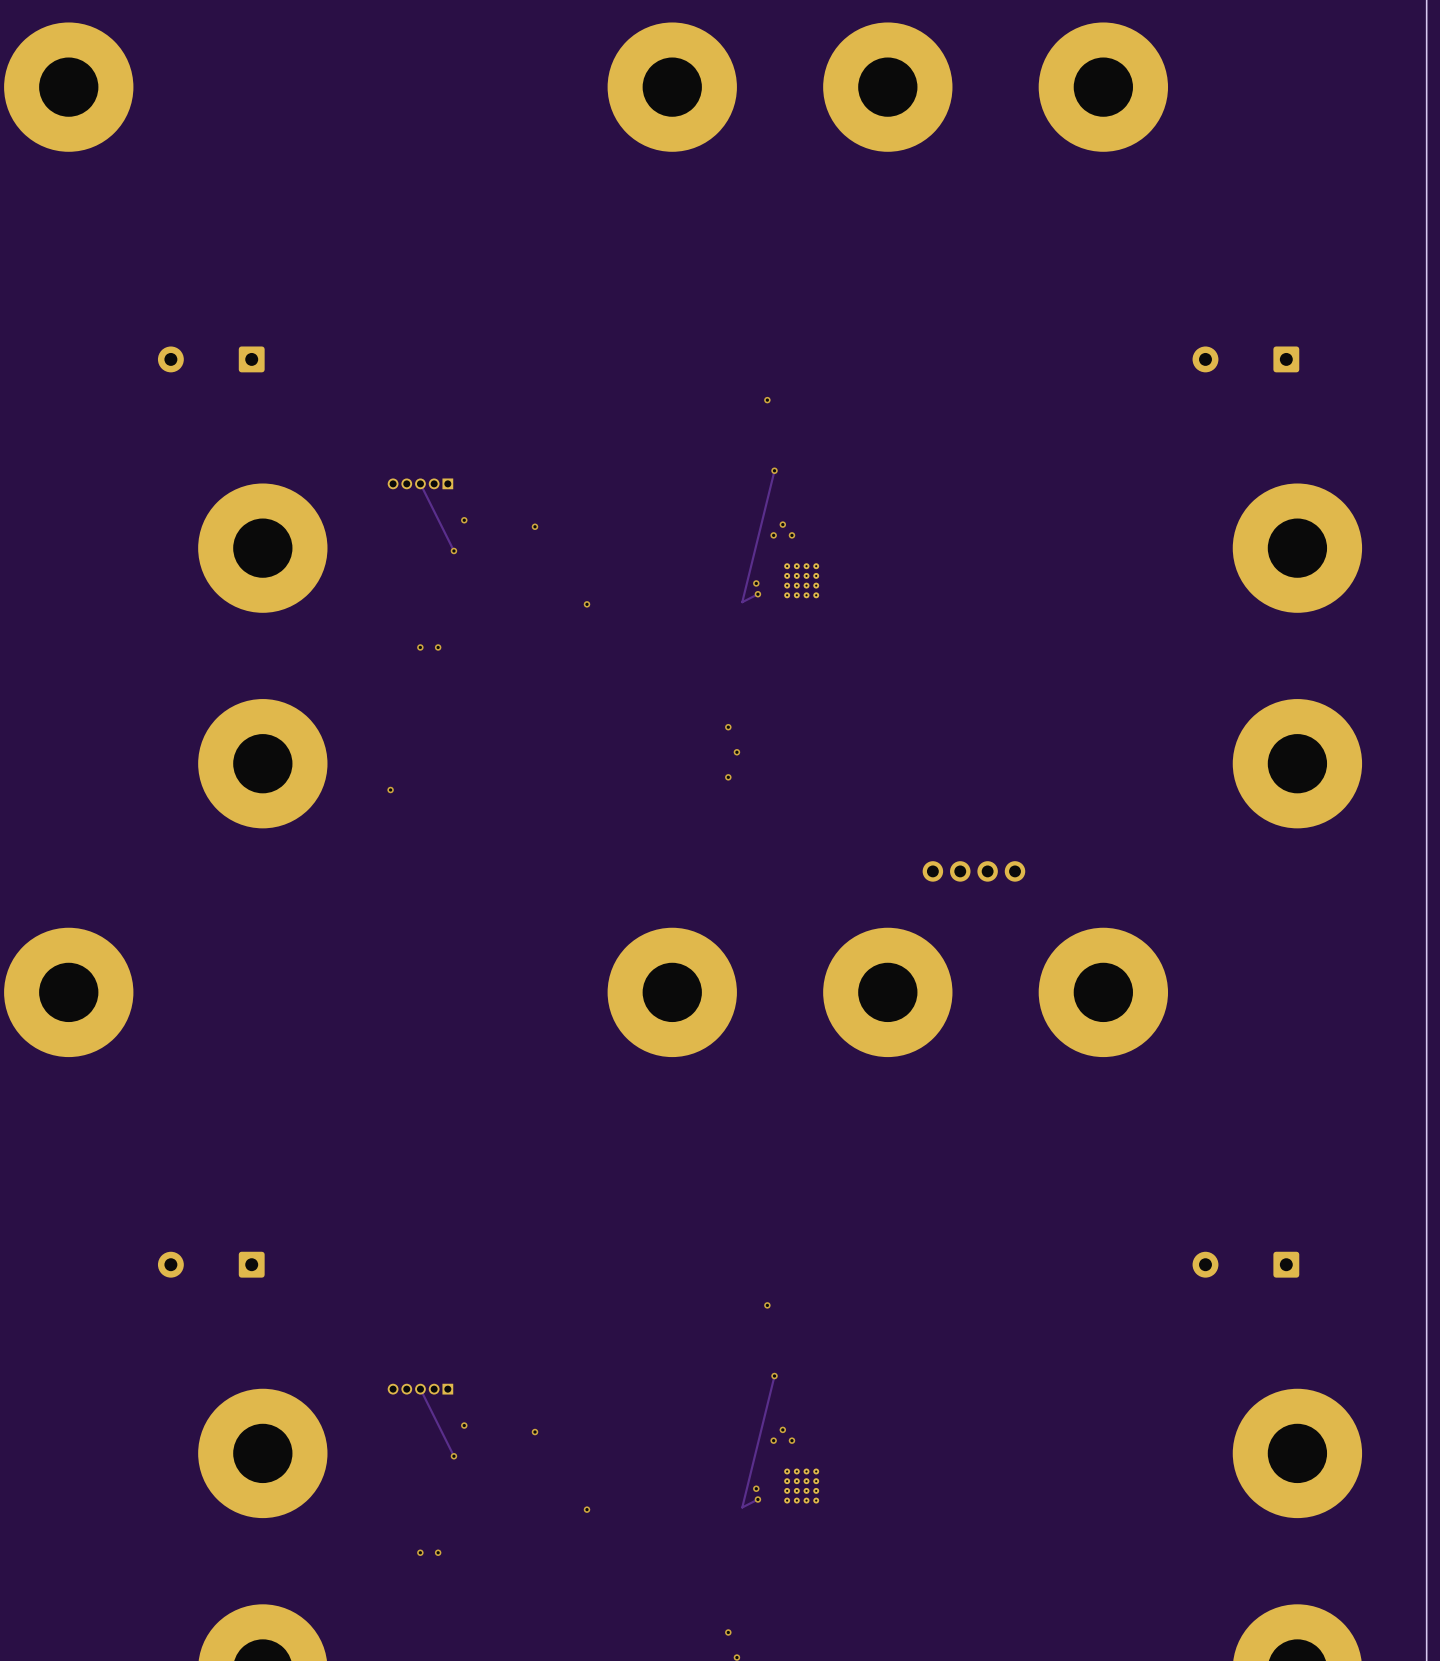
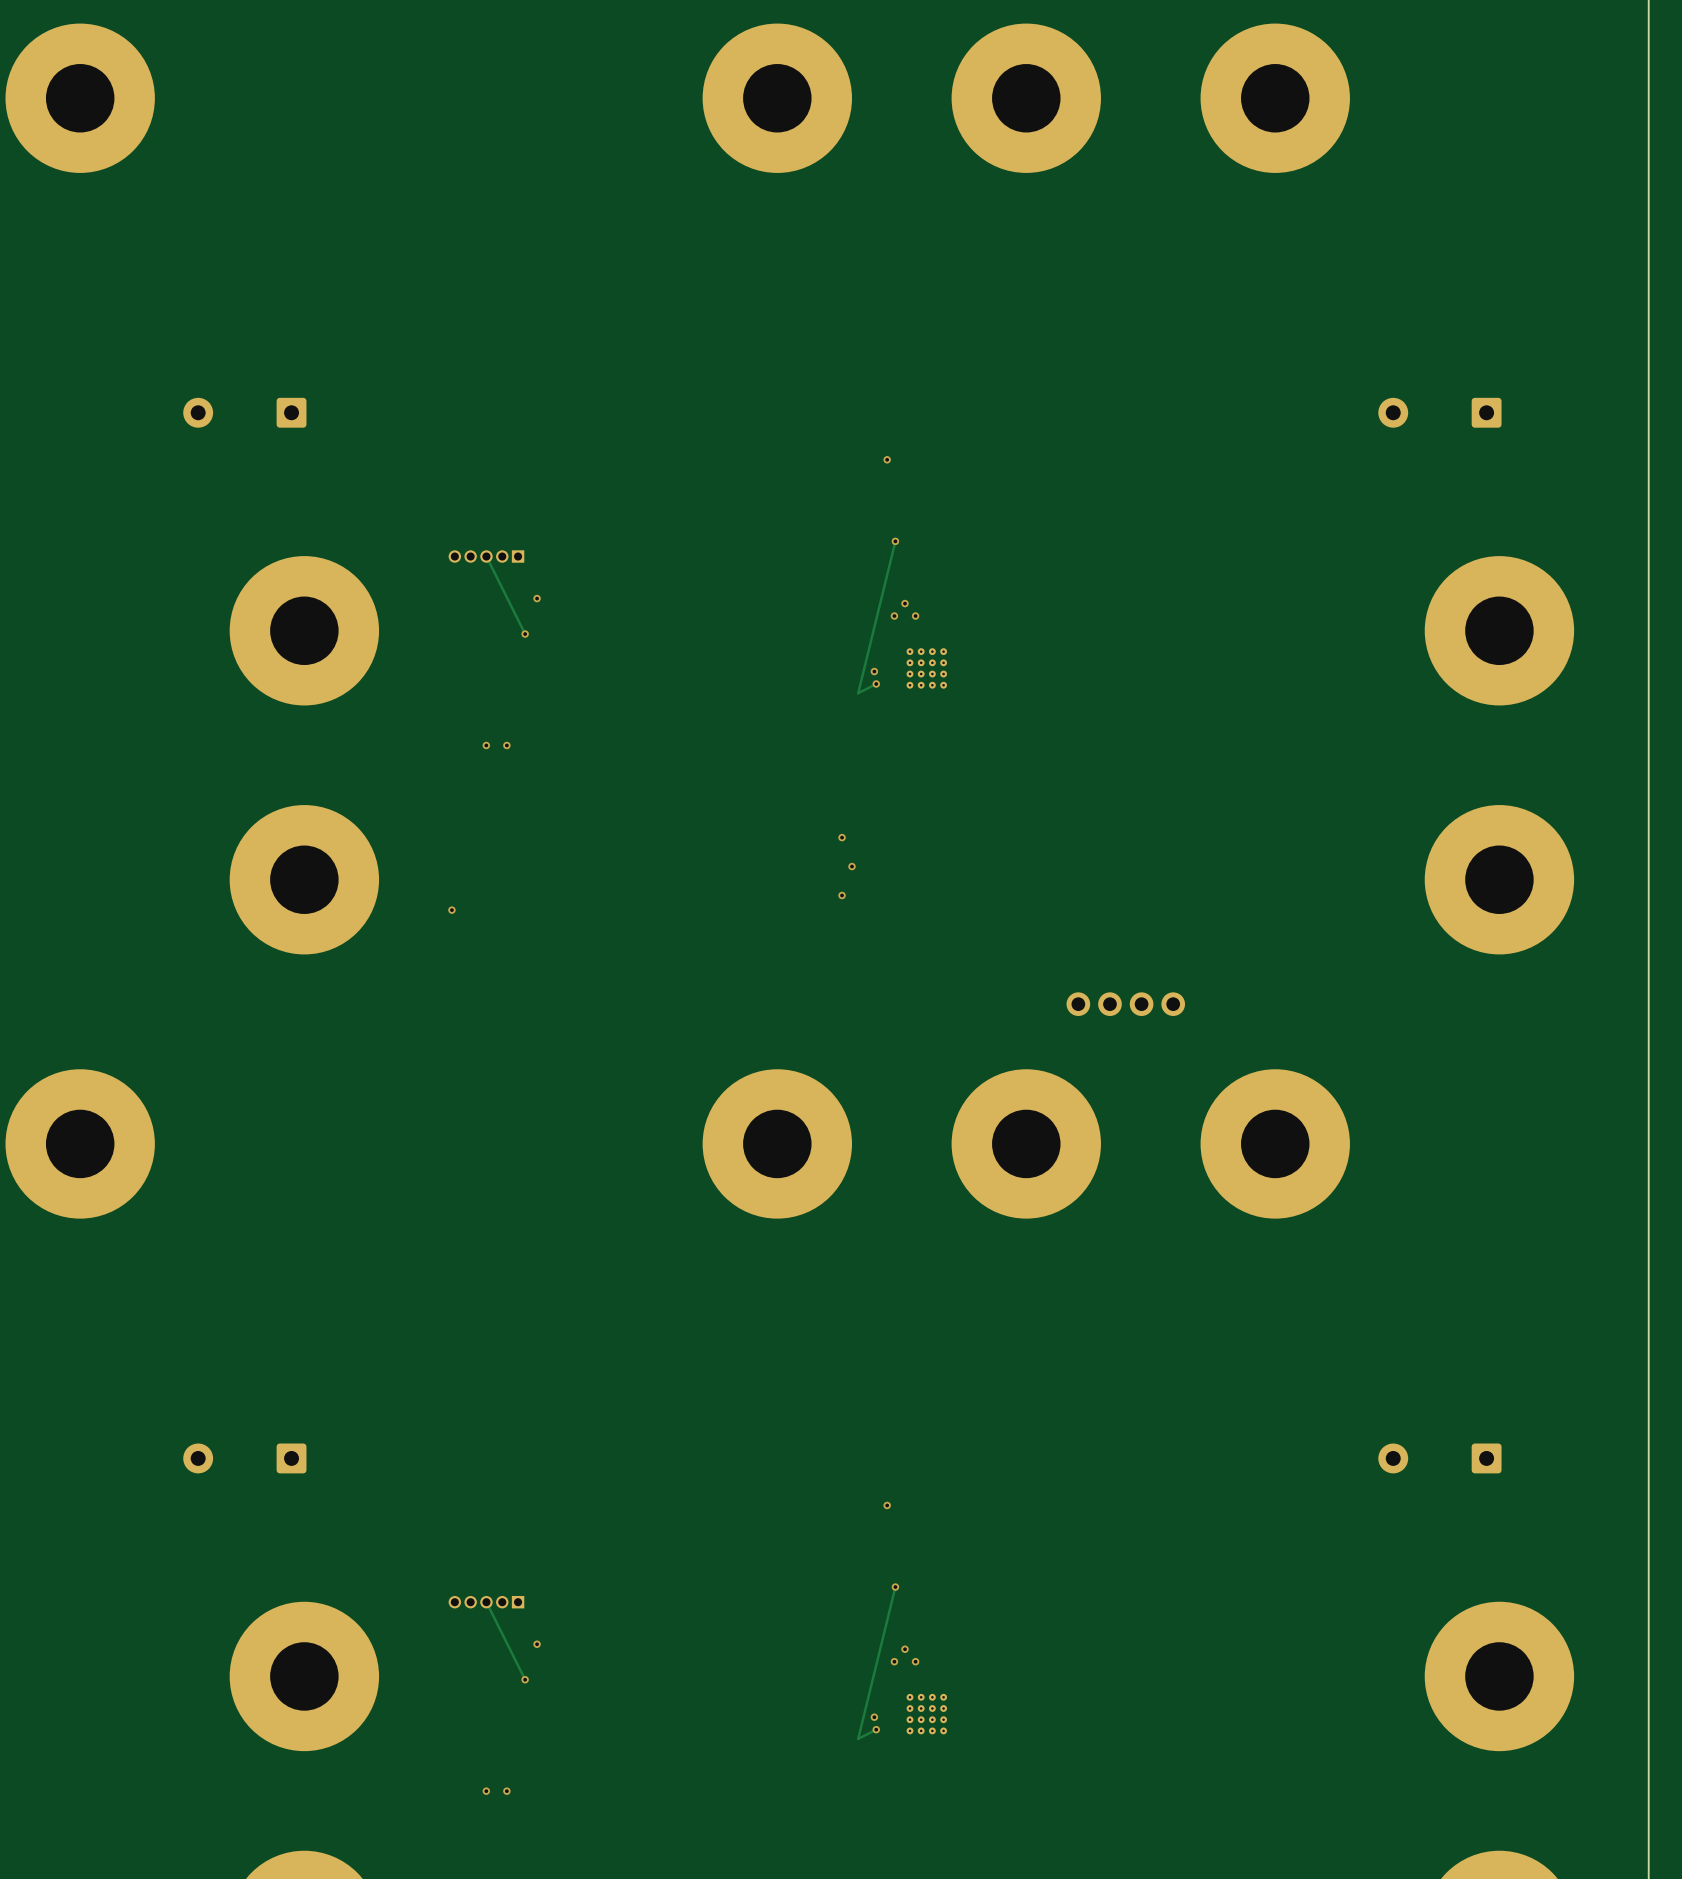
via: (534, 526) -> none
via: (586, 604) -> none
via: (534, 1432) -> none
via: (586, 1509) -> none

